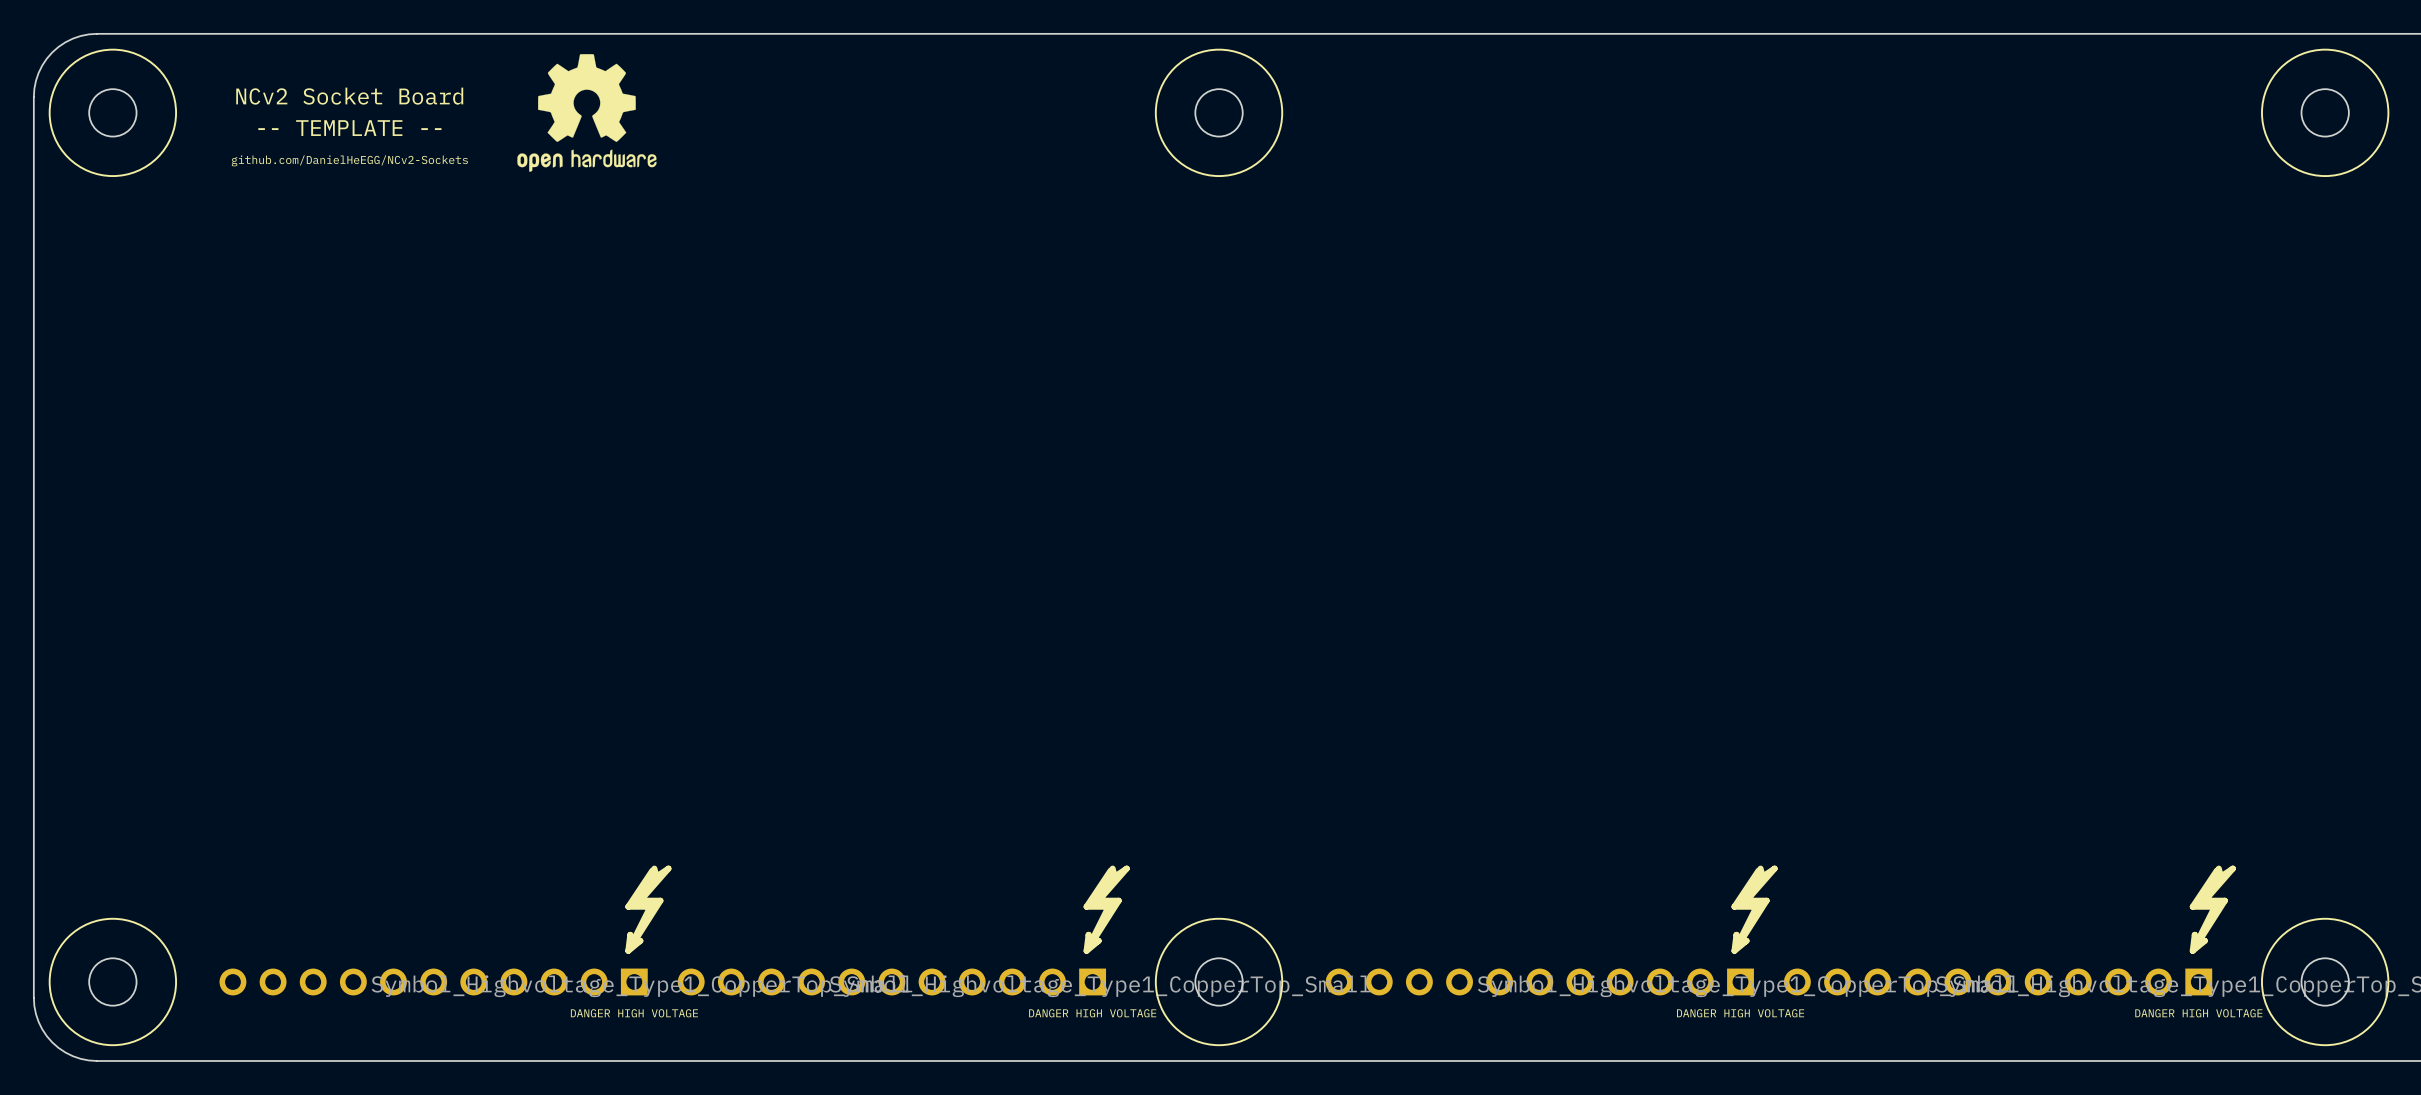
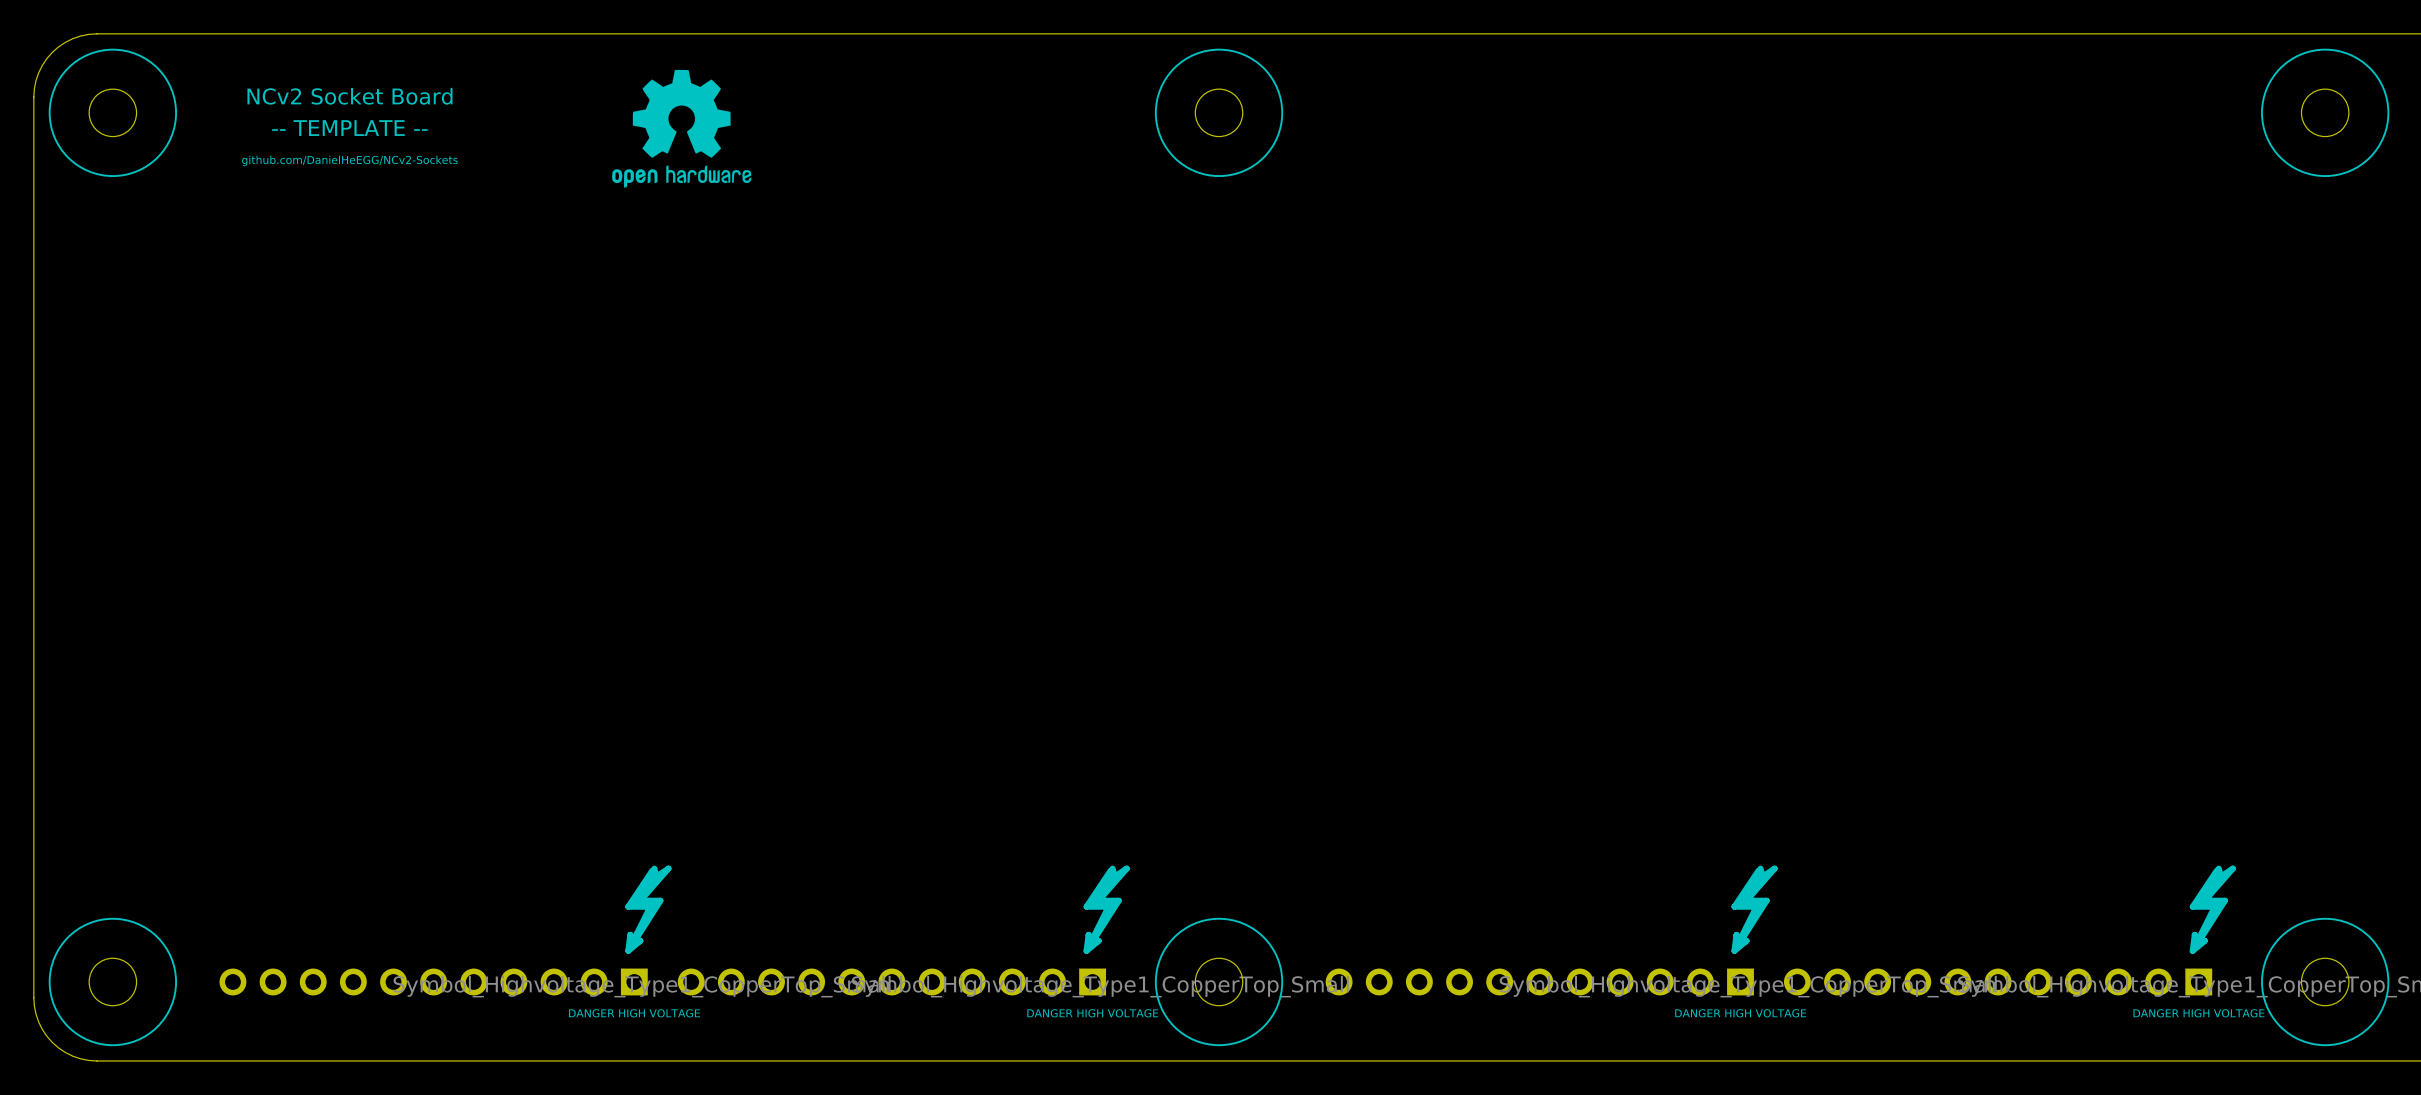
drawing position: (586, 113) -> (681, 128)

